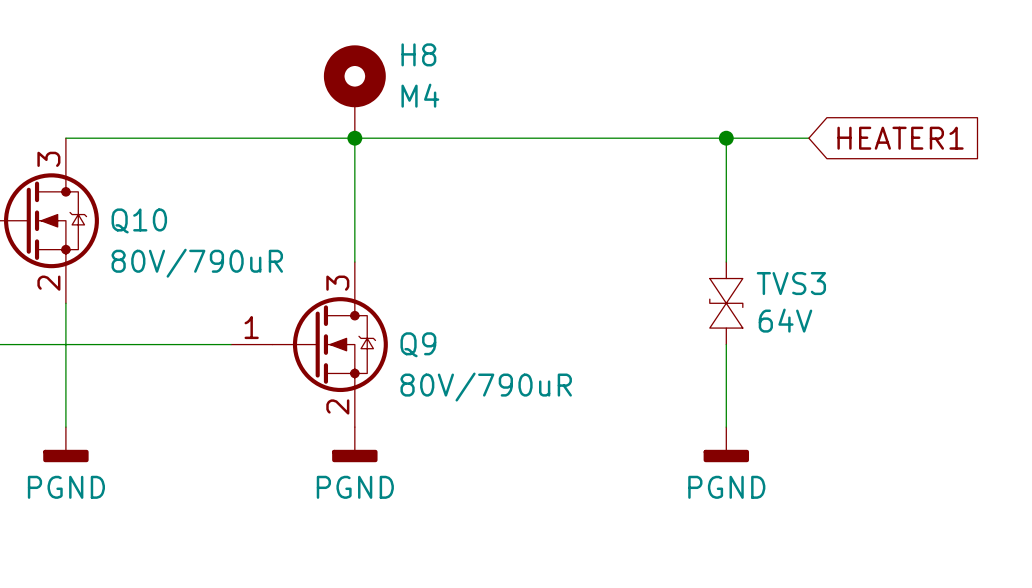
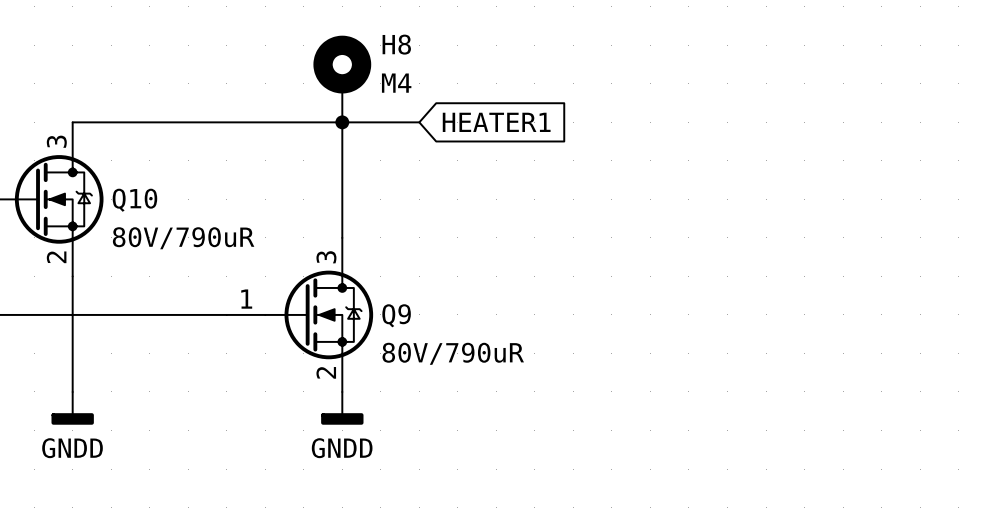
wire: (437, 138) (808, 138) -> none
wire: (726, 138) (726, 262) -> none
junction: (726, 138) -> none
global label position: HEATER1 (900, 138) -> HEATER1 (496, 122)
TVS3: 64V (726, 303) -> none
wire: (726, 344) (726, 427) -> none
power symbol: PGND (65, 444) -> GNDD (72, 408)
power symbol: PGND (354, 444) -> GNDD (342, 408)
power symbol: PGND (726, 444) -> none

